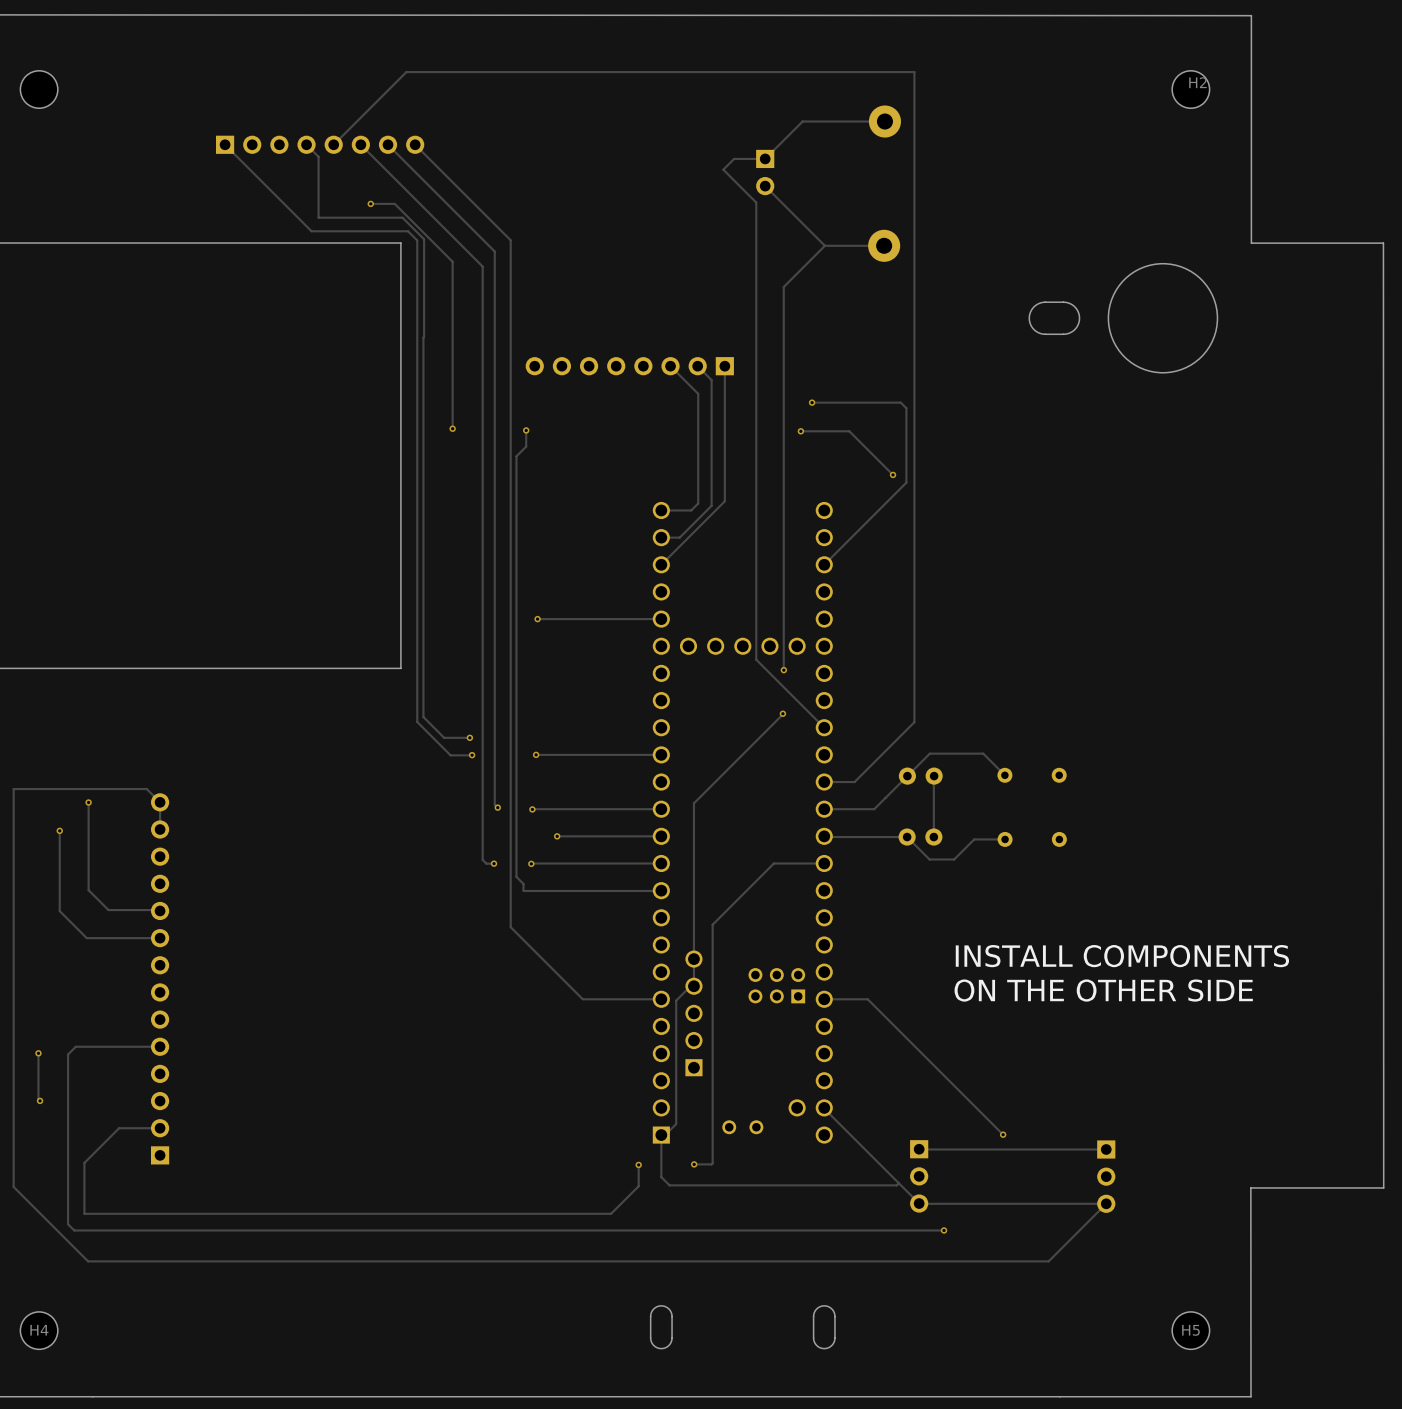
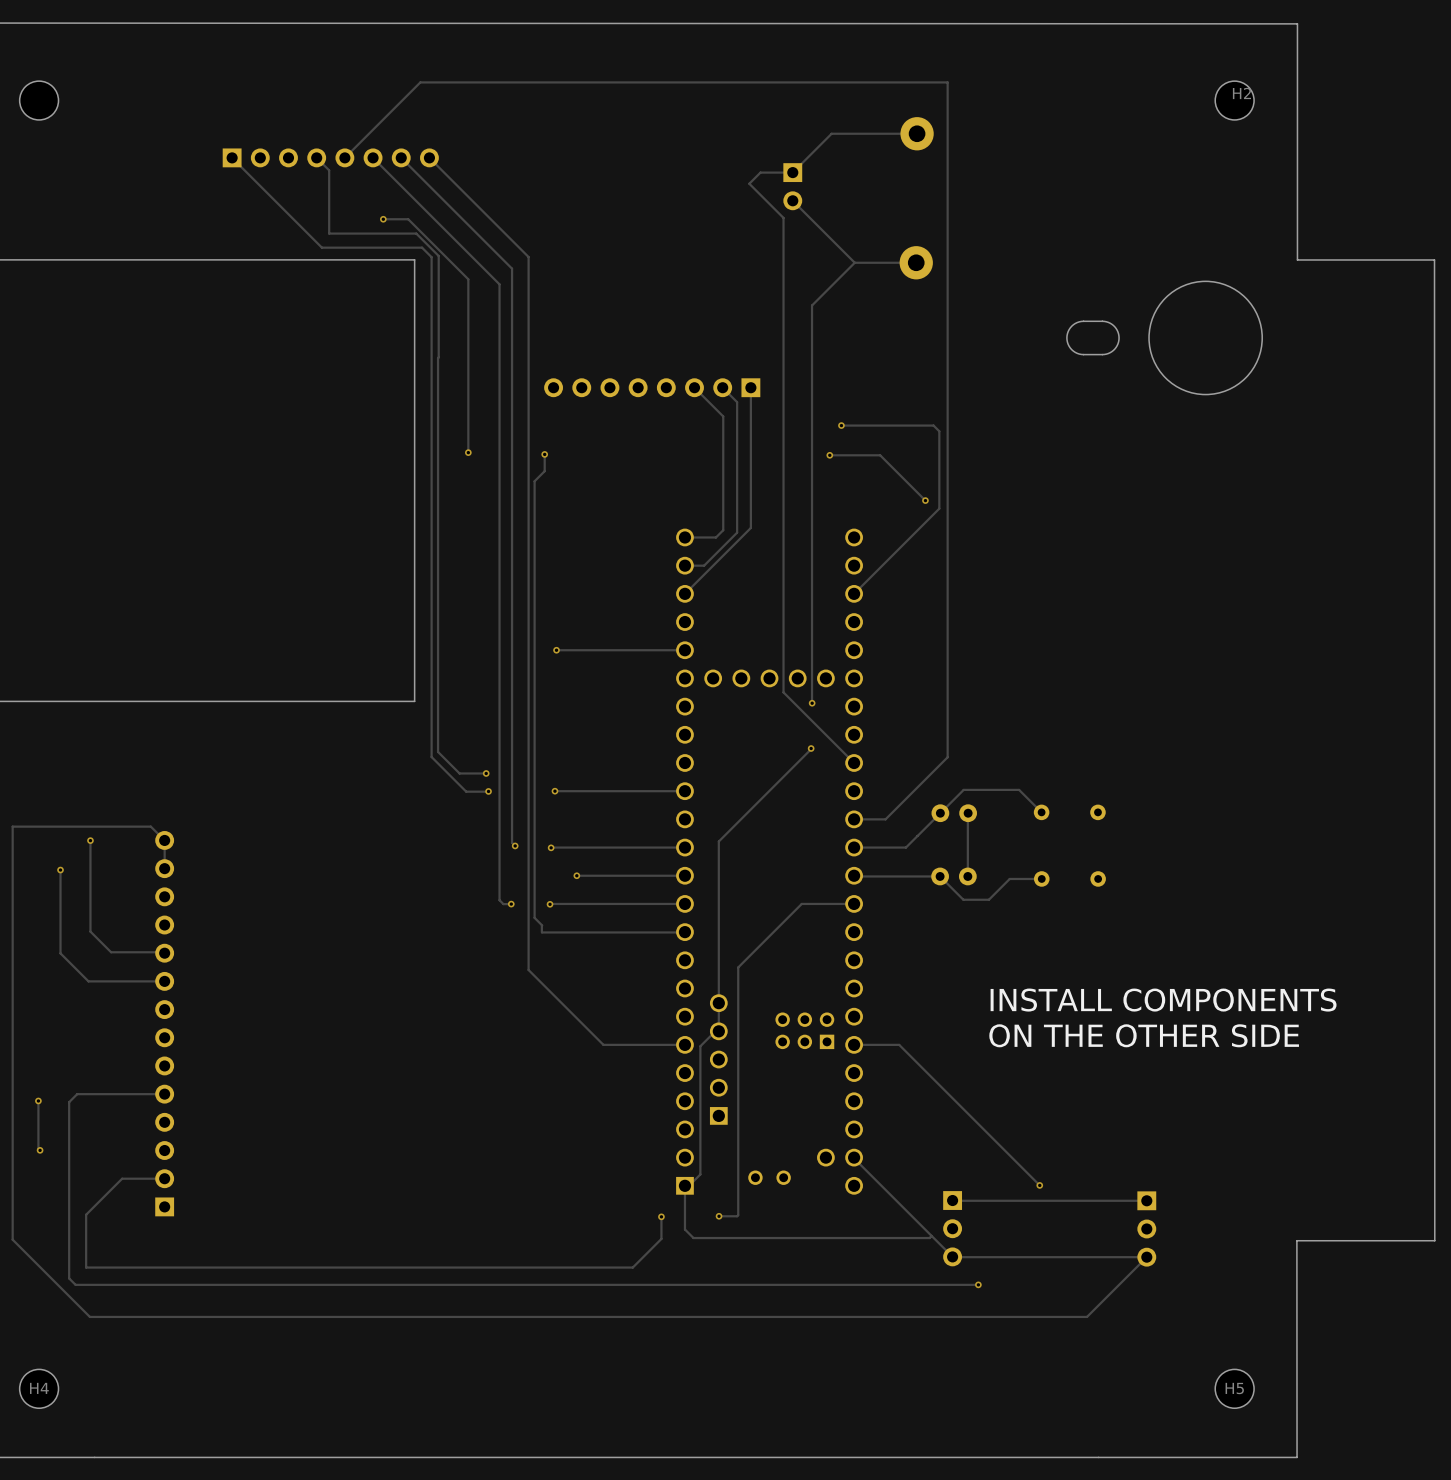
board edge: (650, 1316) (652, 1343) (658, 1348) (666, 1347) (671, 1339) (670, 1311) (665, 1306) (658, 1306) (652, 1310) (650, 1316) -> none
board edge: (813, 1316) (815, 1343) (821, 1348) (829, 1347) (834, 1339) (833, 1311) (828, 1306) (821, 1306) (815, 1310) (813, 1316) -> none

